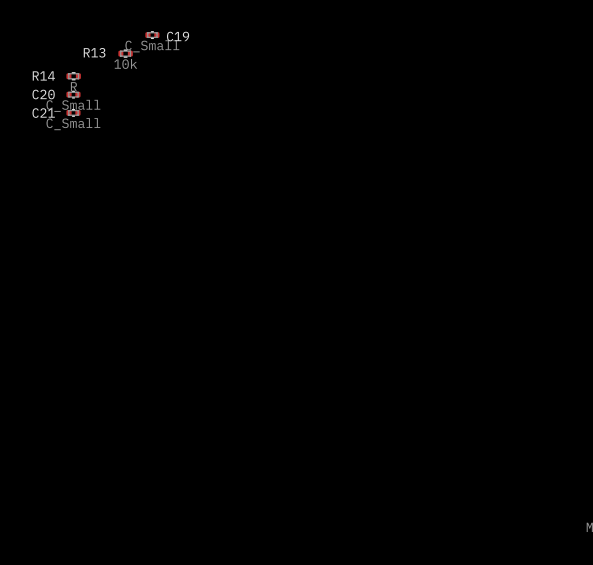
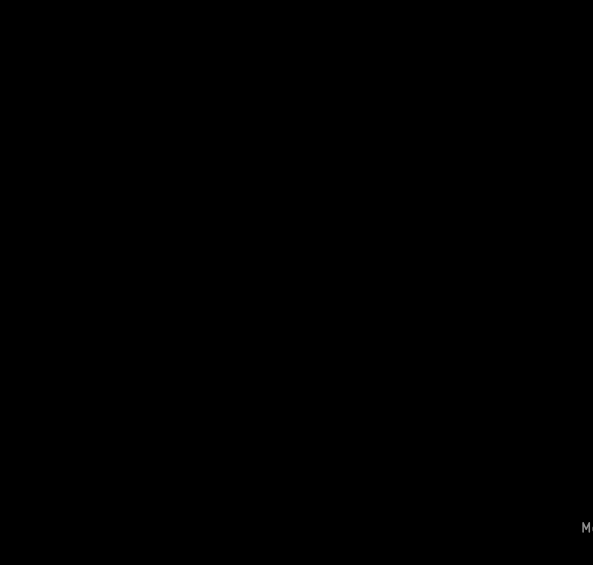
C19: C_Small (152, 35) -> none
R13: 10k (125, 53) -> none
R14: R (73, 76) -> none
C20: C_Small (73, 94) -> none
C21: C_Small (73, 112) -> none

